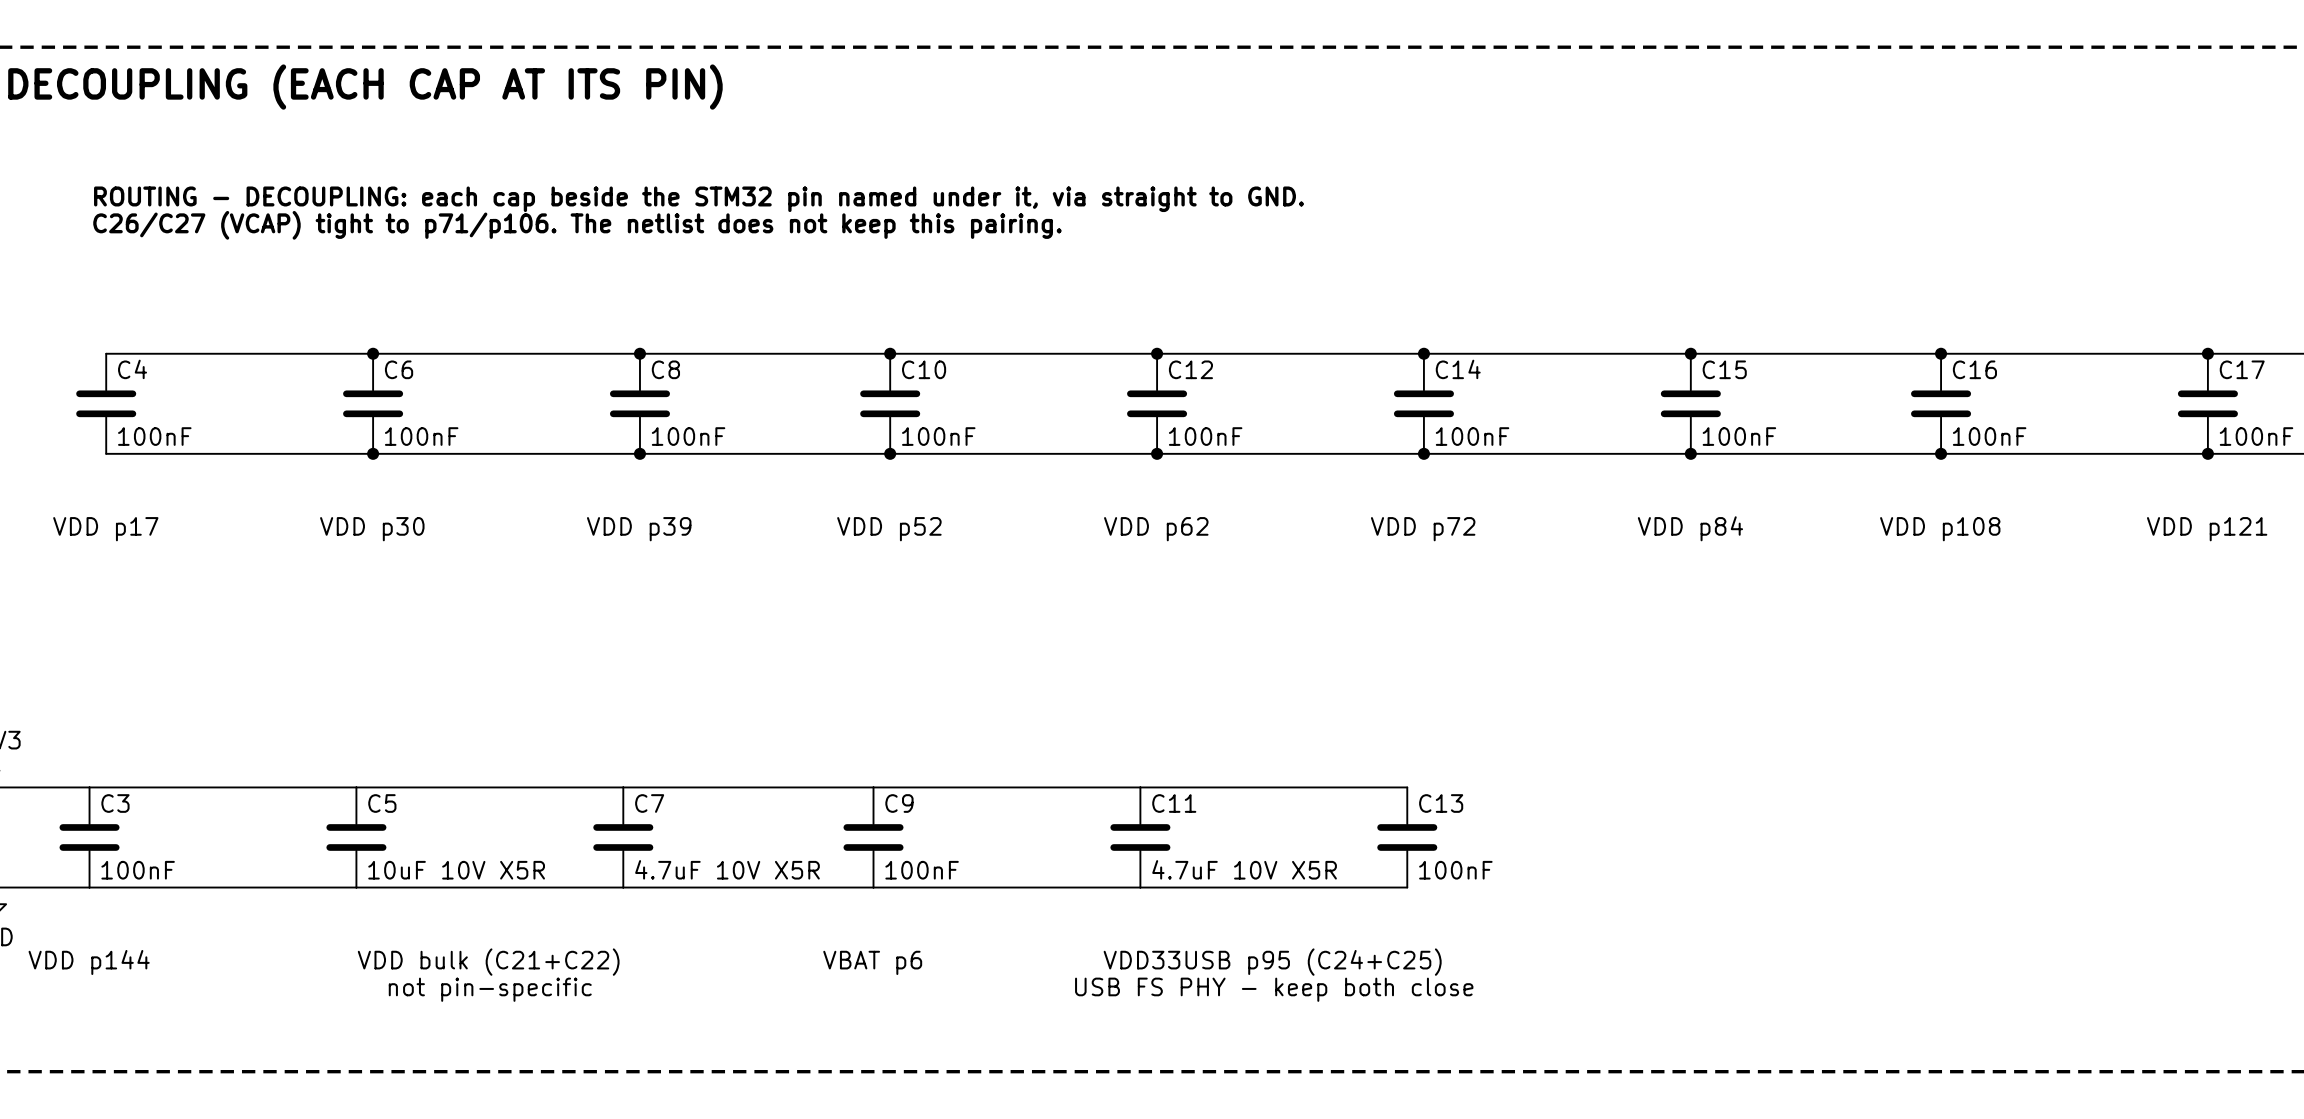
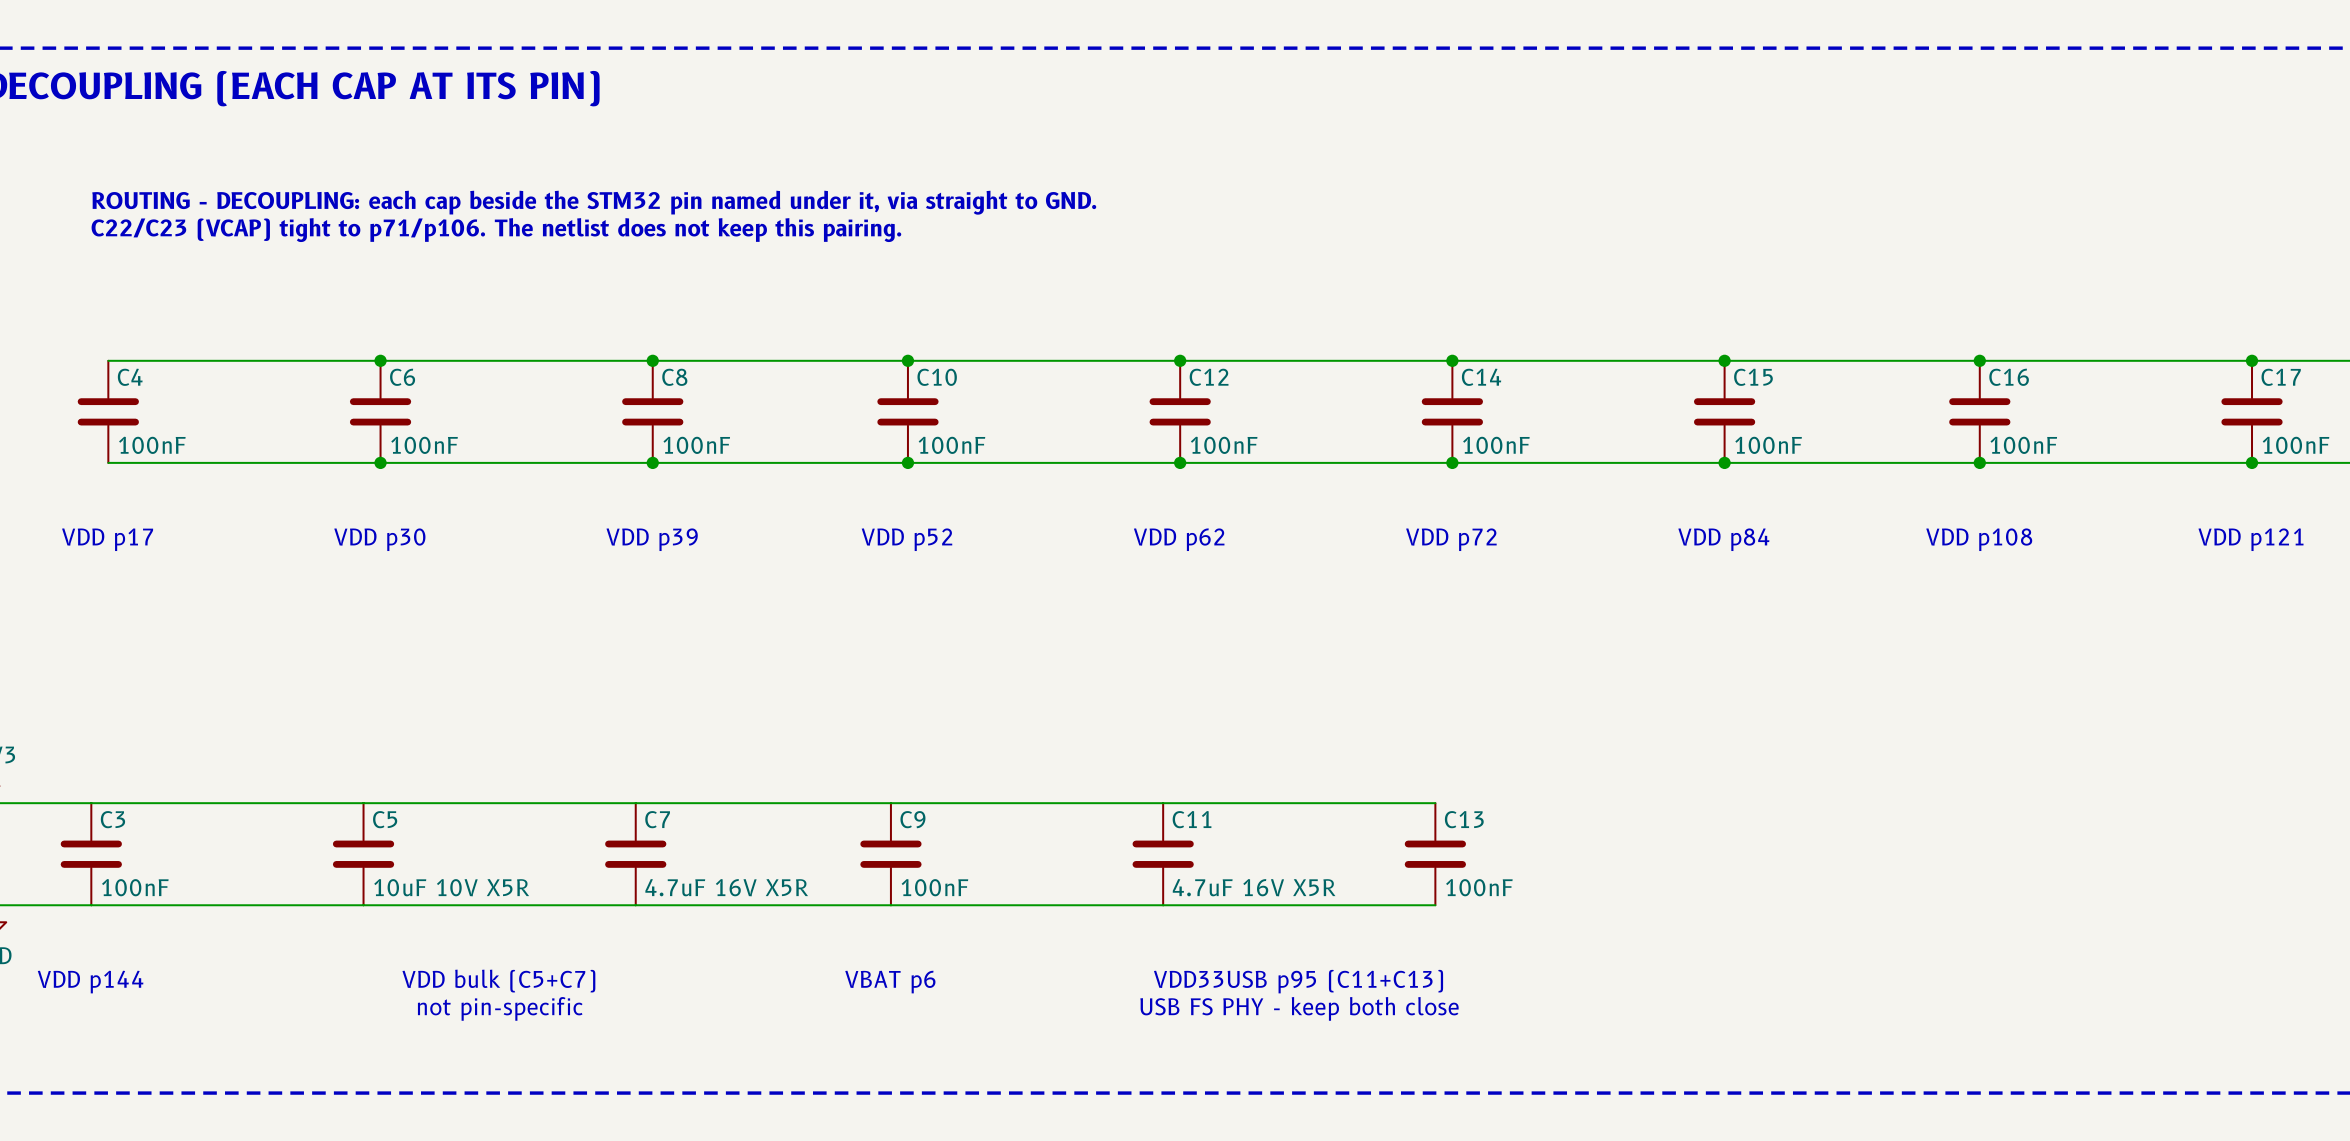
text: C26/C27 (VCAP) tight to p71/p106. The netlist does not keep this pairing. (577, 225) -> C22/C23 (VCAP) tight to p71/p106. The netlist does not keep this pairing. (496, 230)
C7 value: 4.7uF 10V X5R (727, 869) -> 4.7uF 16V X5R (726, 887)
C11 value: 4.7uF 10V X5R (1244, 869) -> 4.7uF 16V X5R (1254, 887)
text: VDD bulk (C21+C22) (488, 962) -> VDD bulk (C5+C7) (498, 981)
text: VDD33USB p95 (C24+C25) (1272, 962) -> VDD33USB p95 (C11+C13) (1298, 981)

